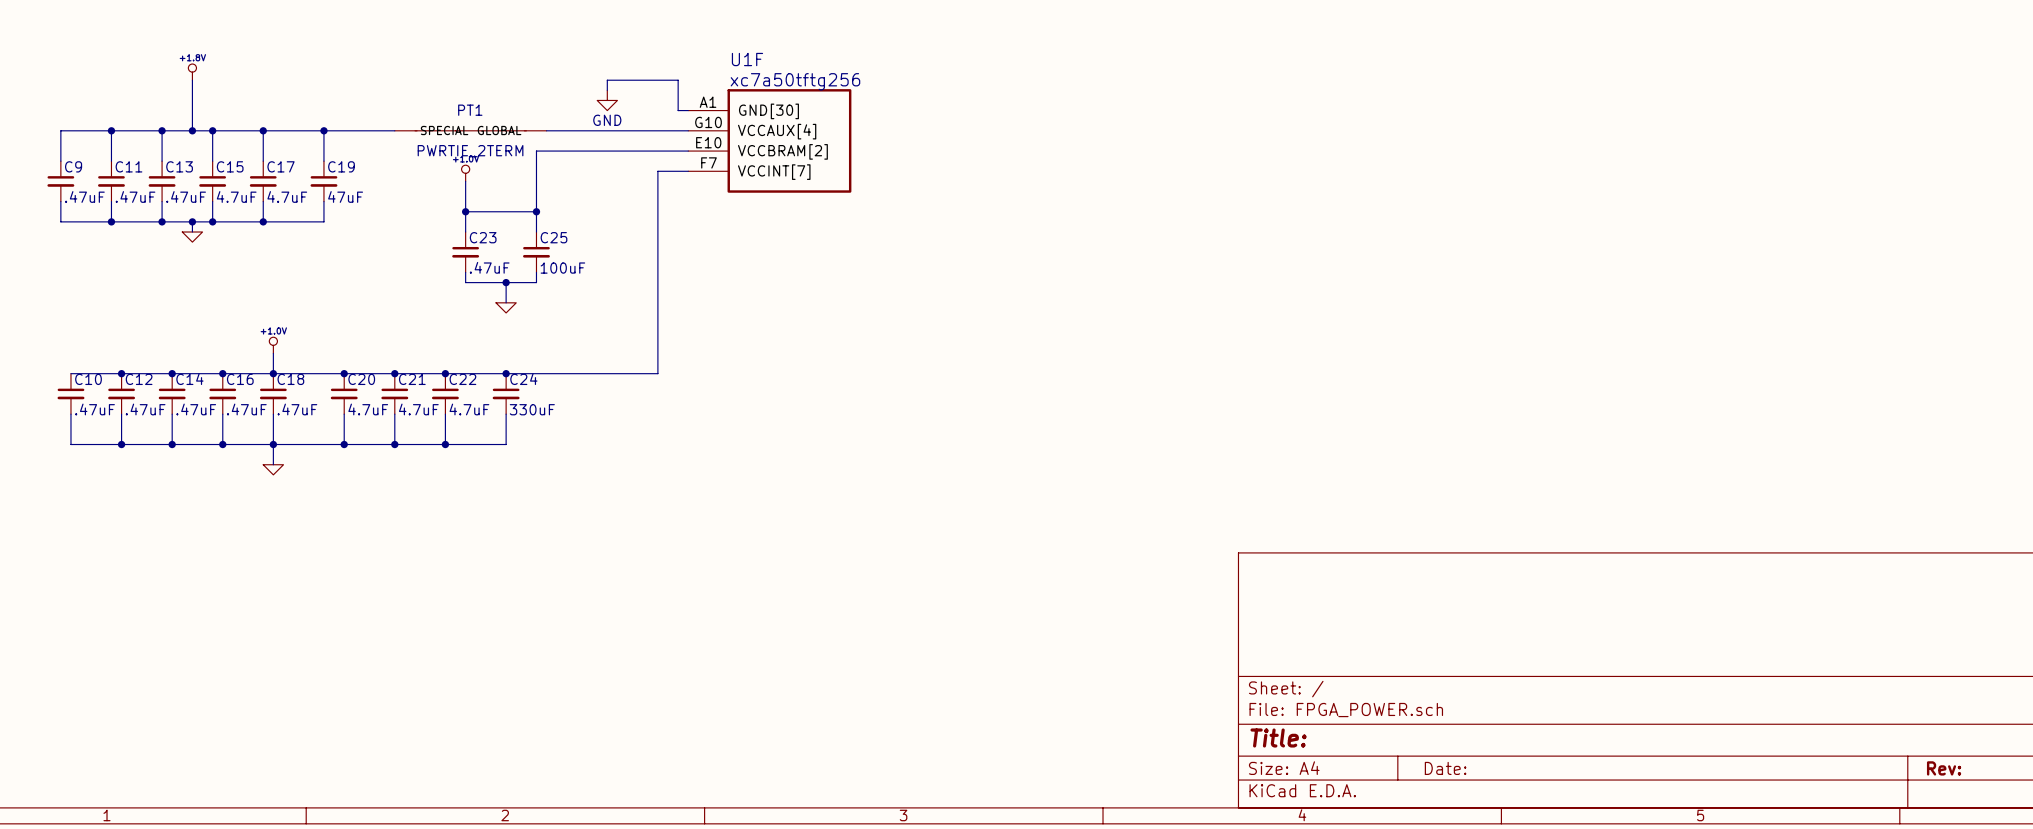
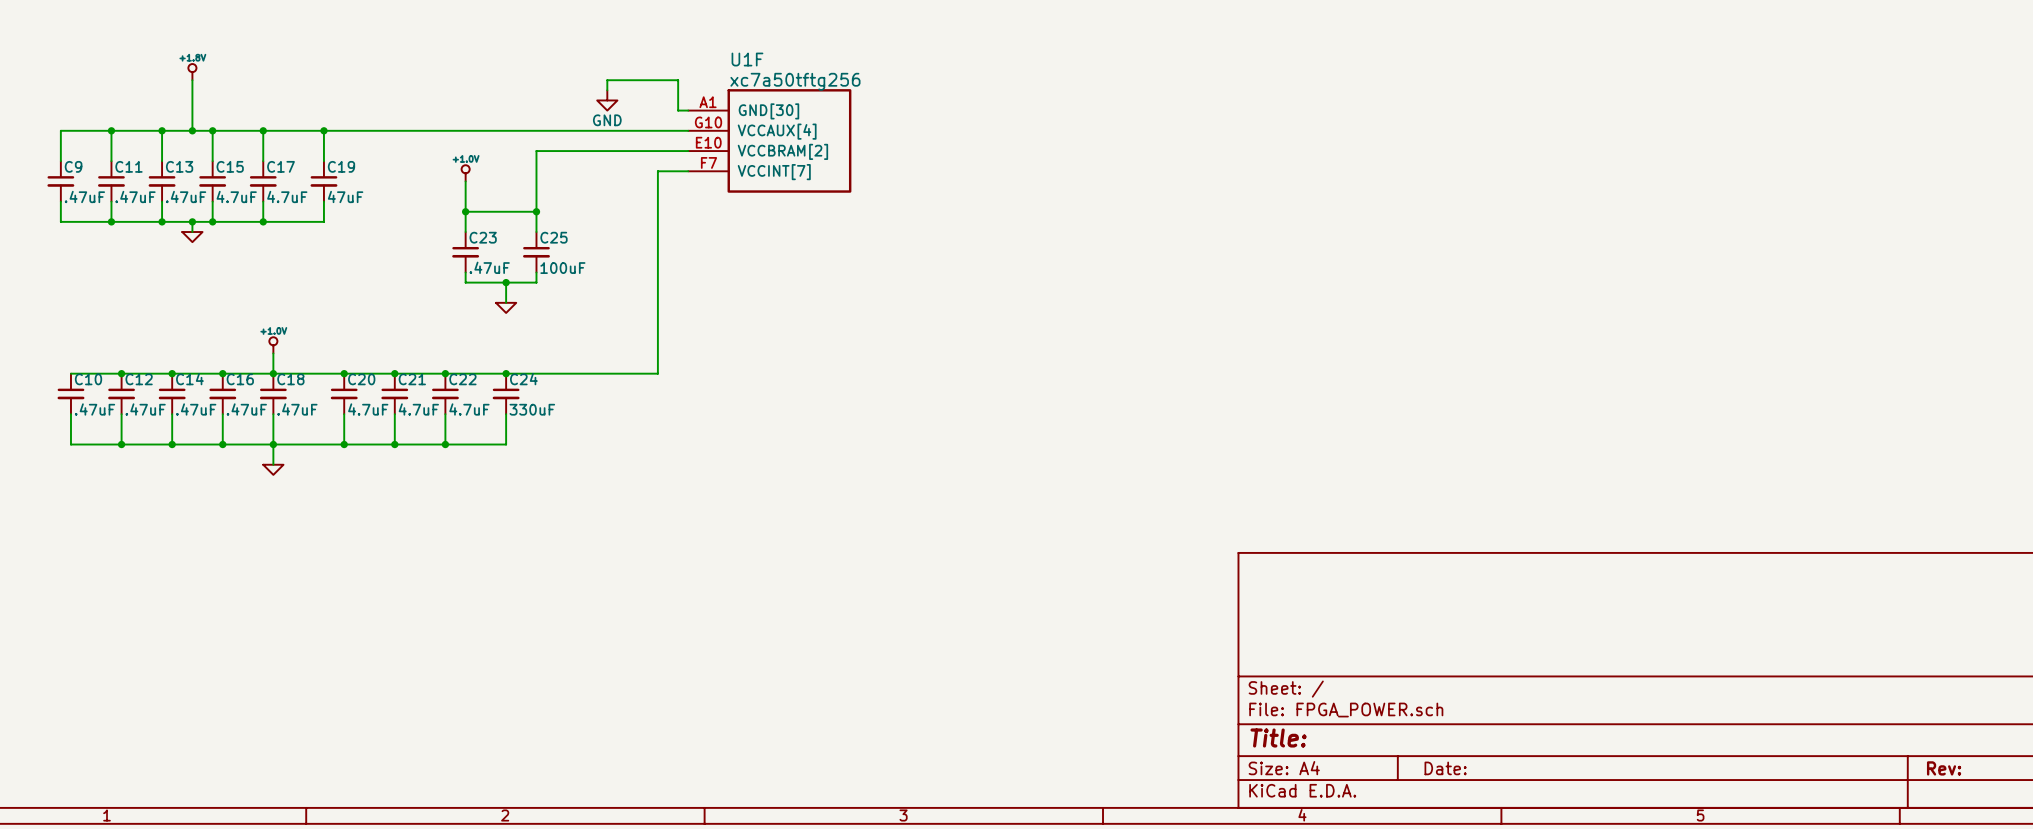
PT1: PWRTIE_2TERM (470, 130) -> none

